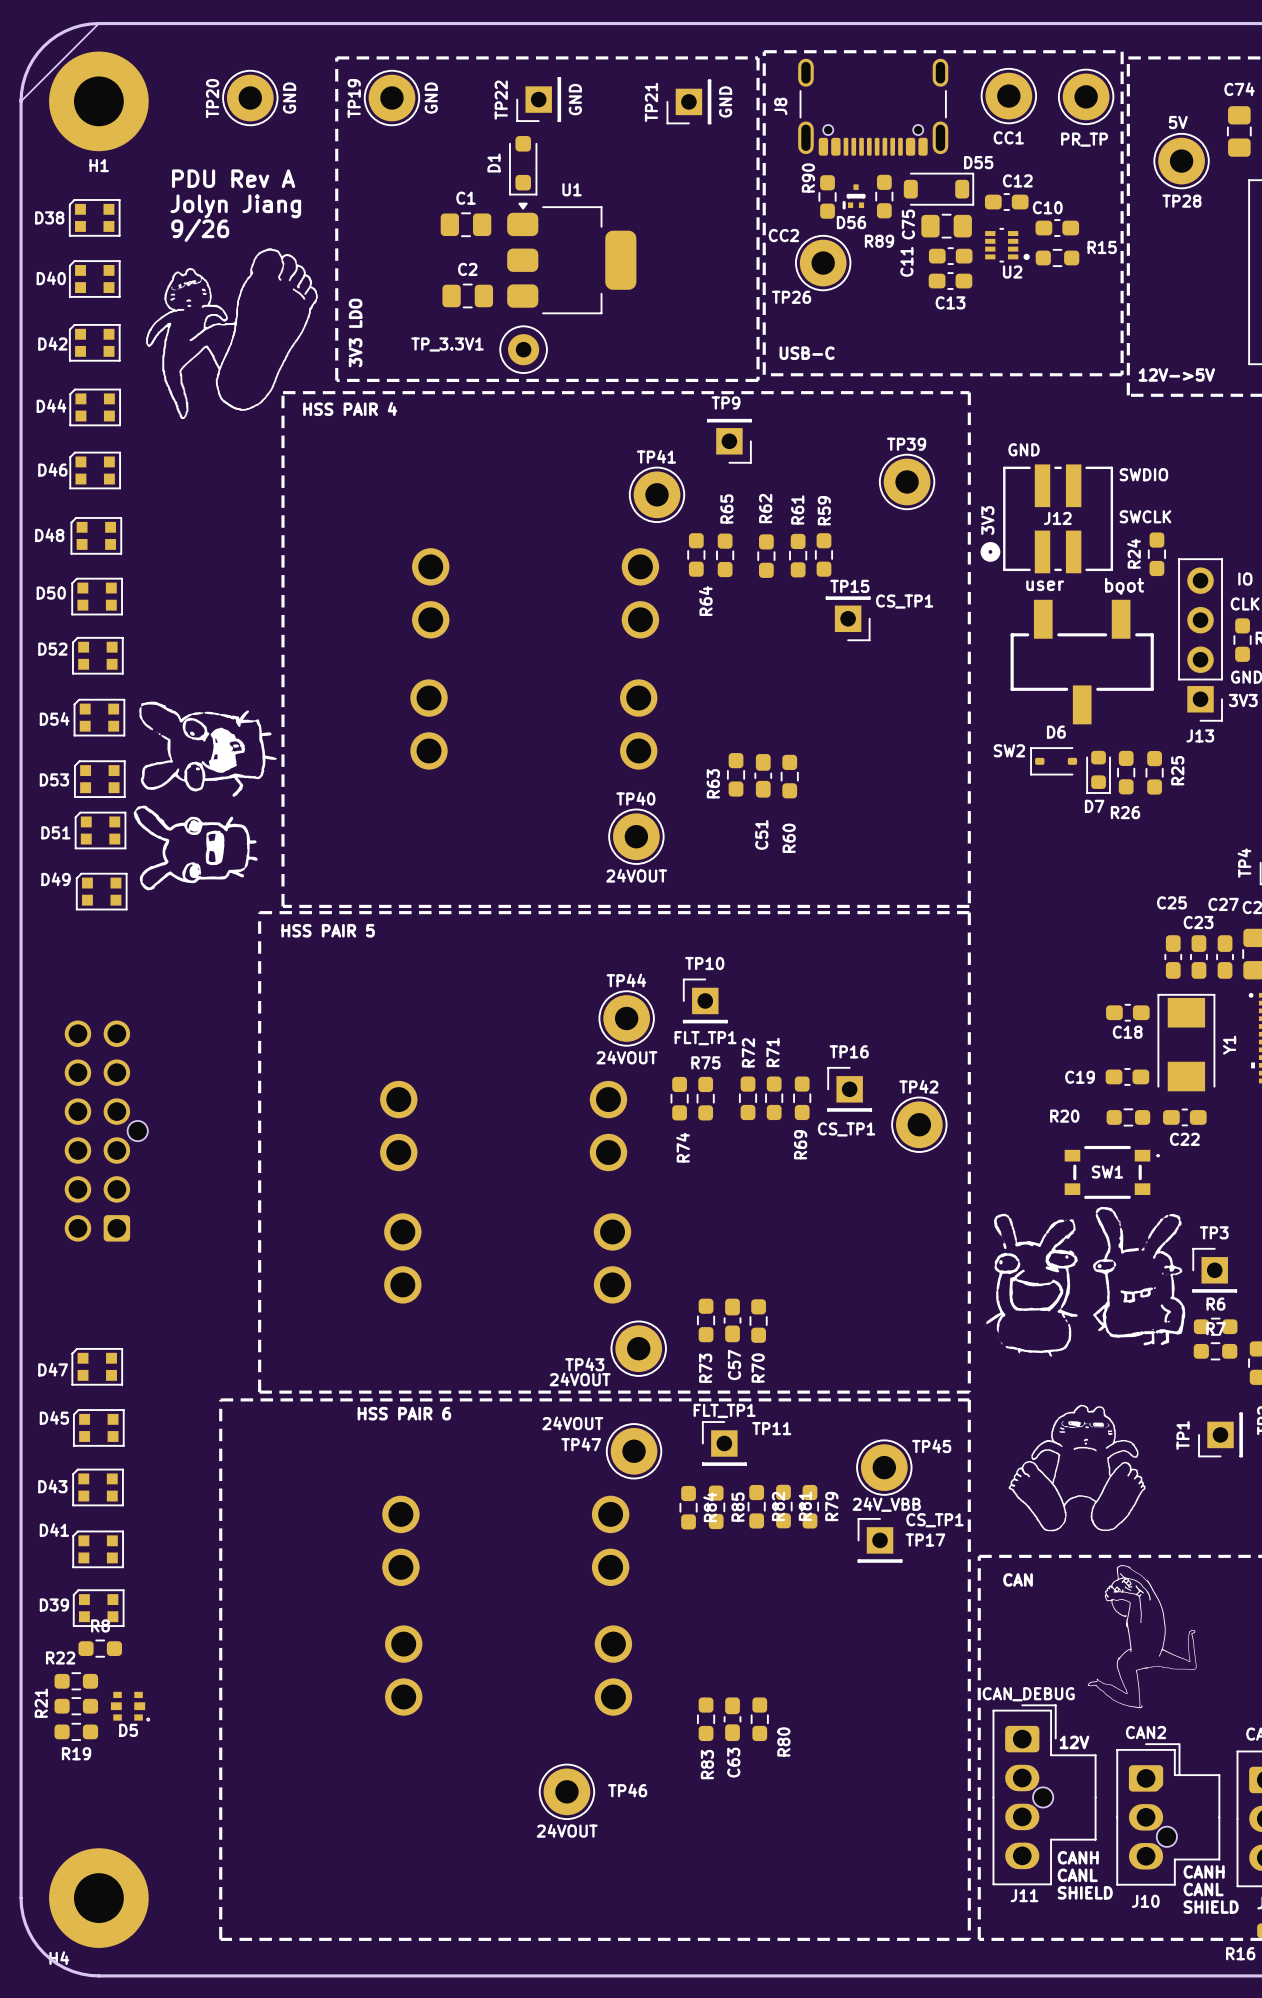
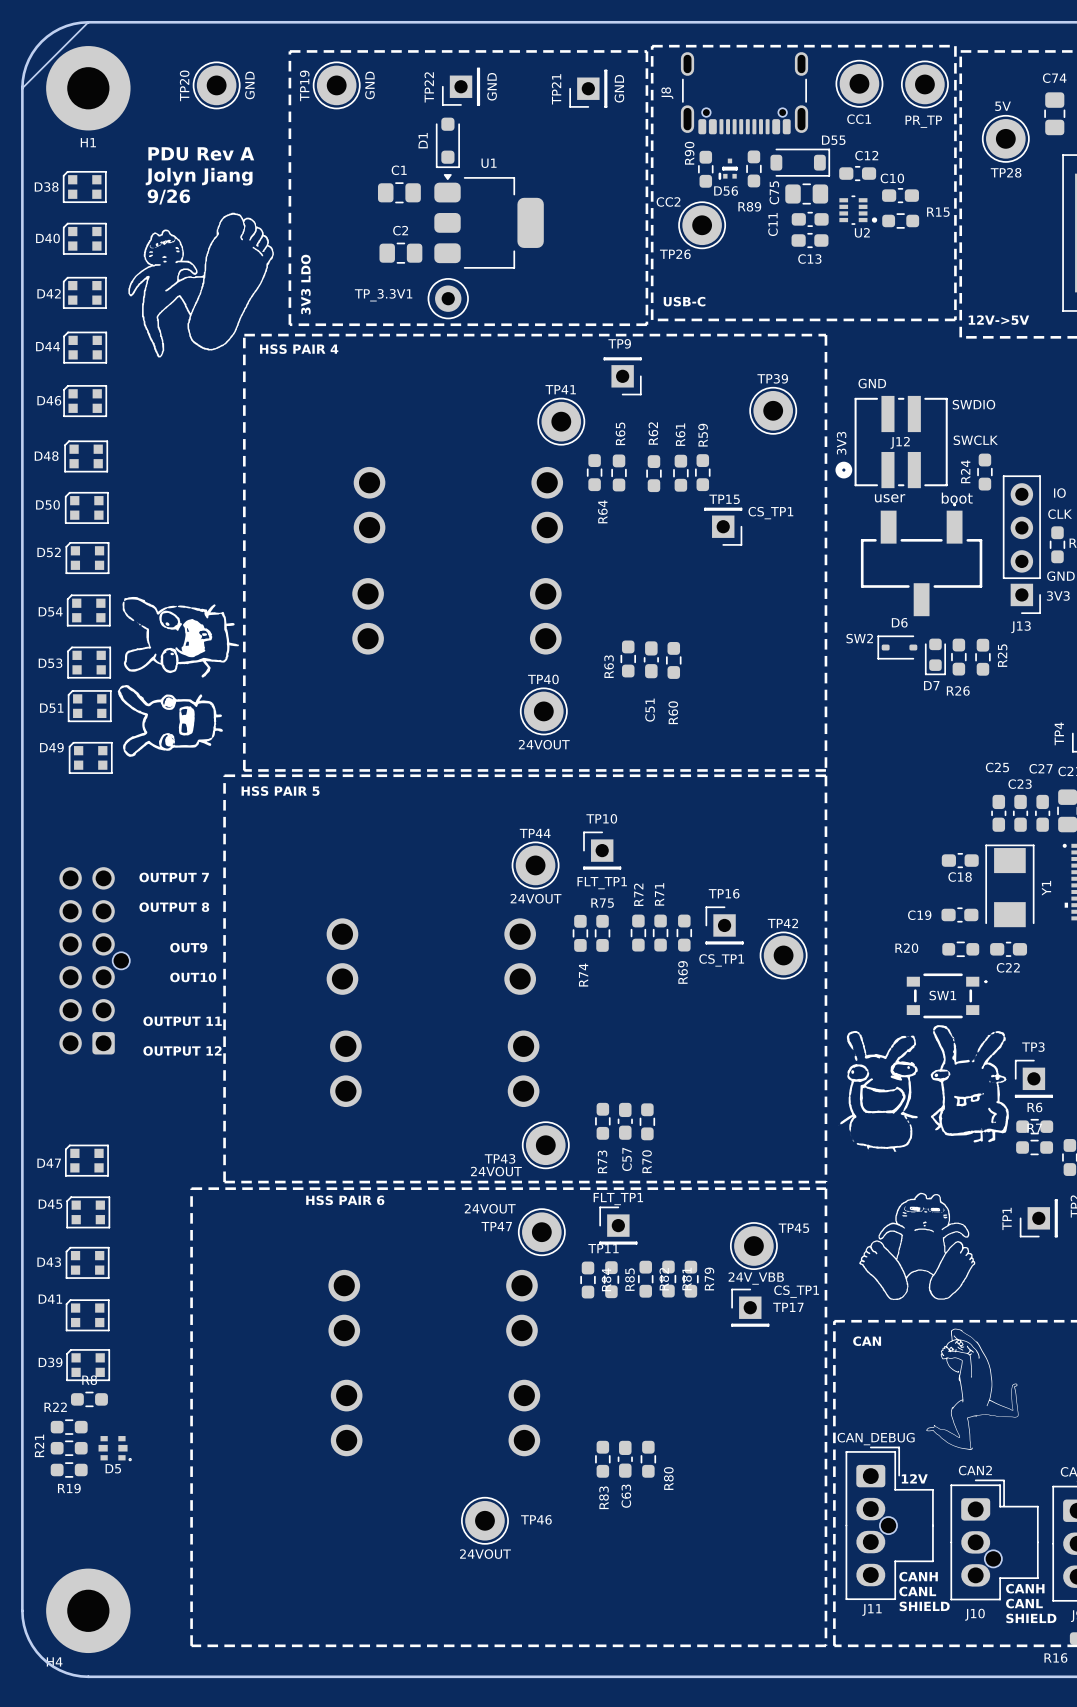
text: none -> OUTPUT 7 (174, 877)
text: none -> OUTPUT 8 (174, 907)
text: none -> OUT9 (188, 947)
text: none -> OUT10 (193, 977)
text: none -> OUTPUT 11 (182, 1021)
text: none -> OUTPUT 12 (182, 1050)
TP11 name position: TP11 (771, 1428) -> TP11 (603, 1248)

